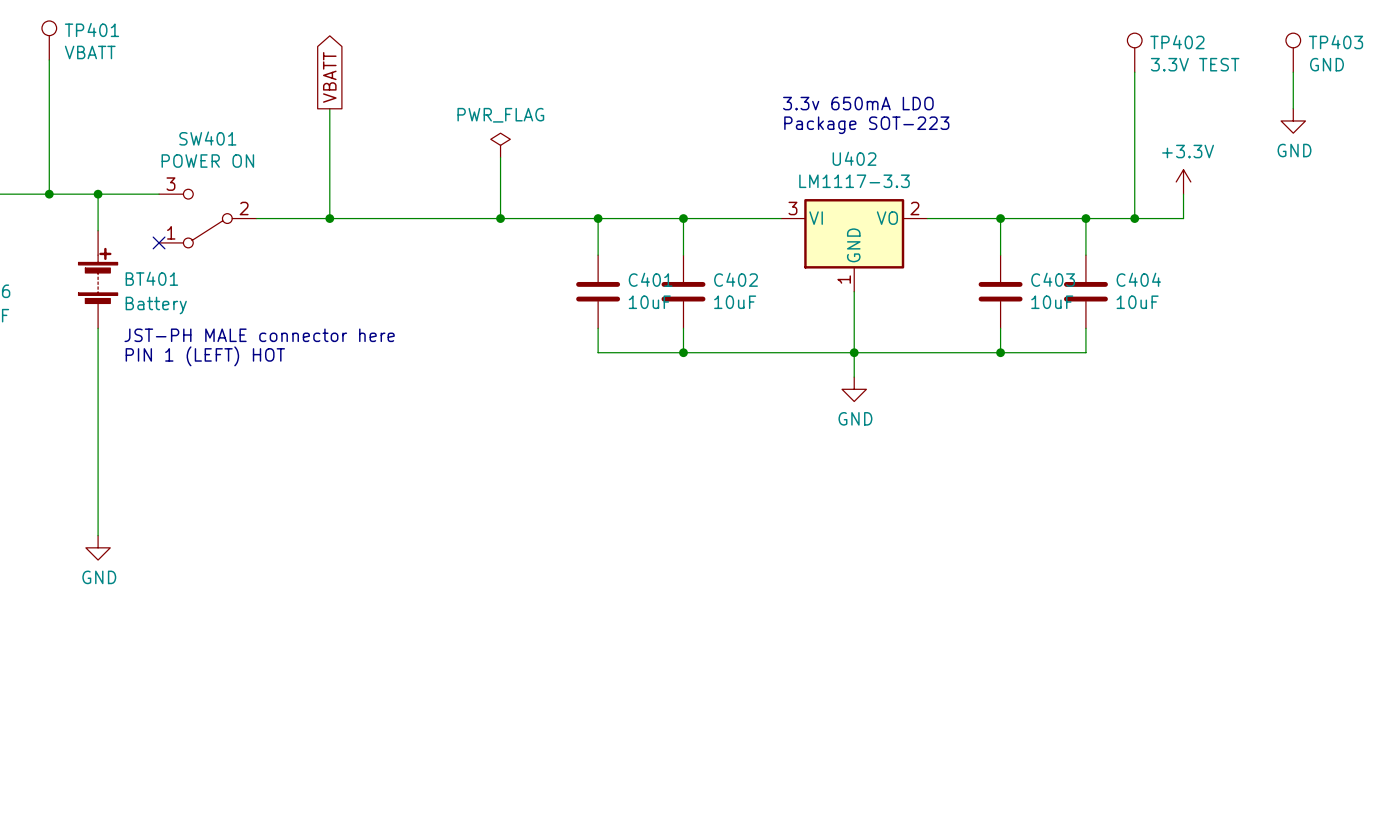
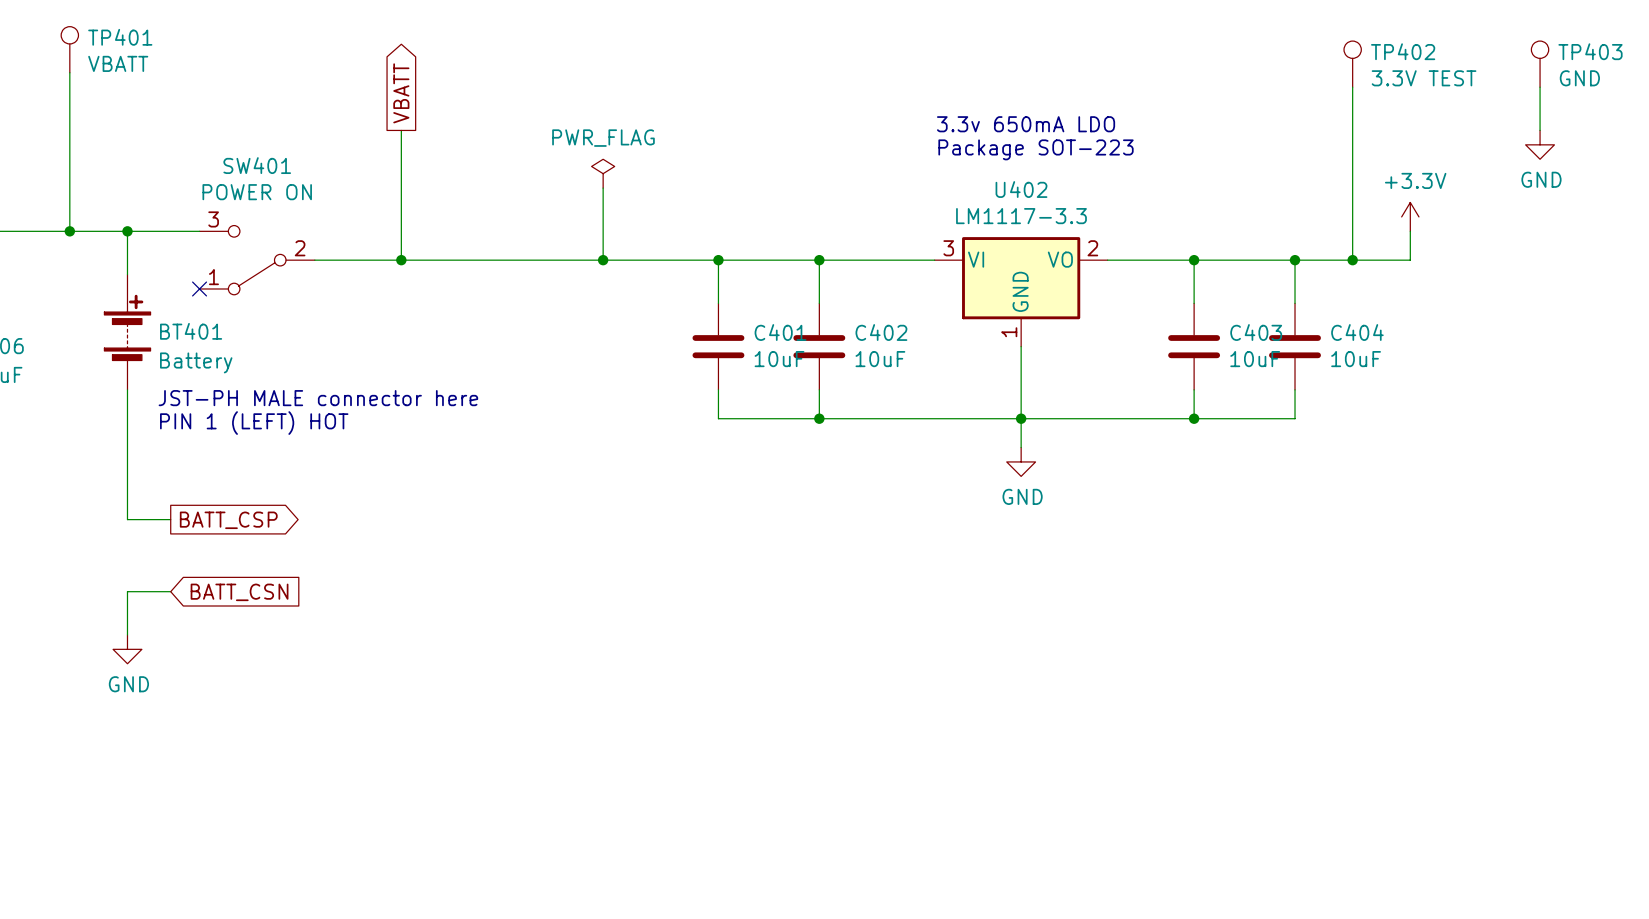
wire: (98, 438) (98, 499) -> (127, 519) (170, 519)
global label: none -> BATT_CSP (228, 520)
wire: none -> (127, 591) (170, 591)
global label: none -> BATT_CSN (239, 592)

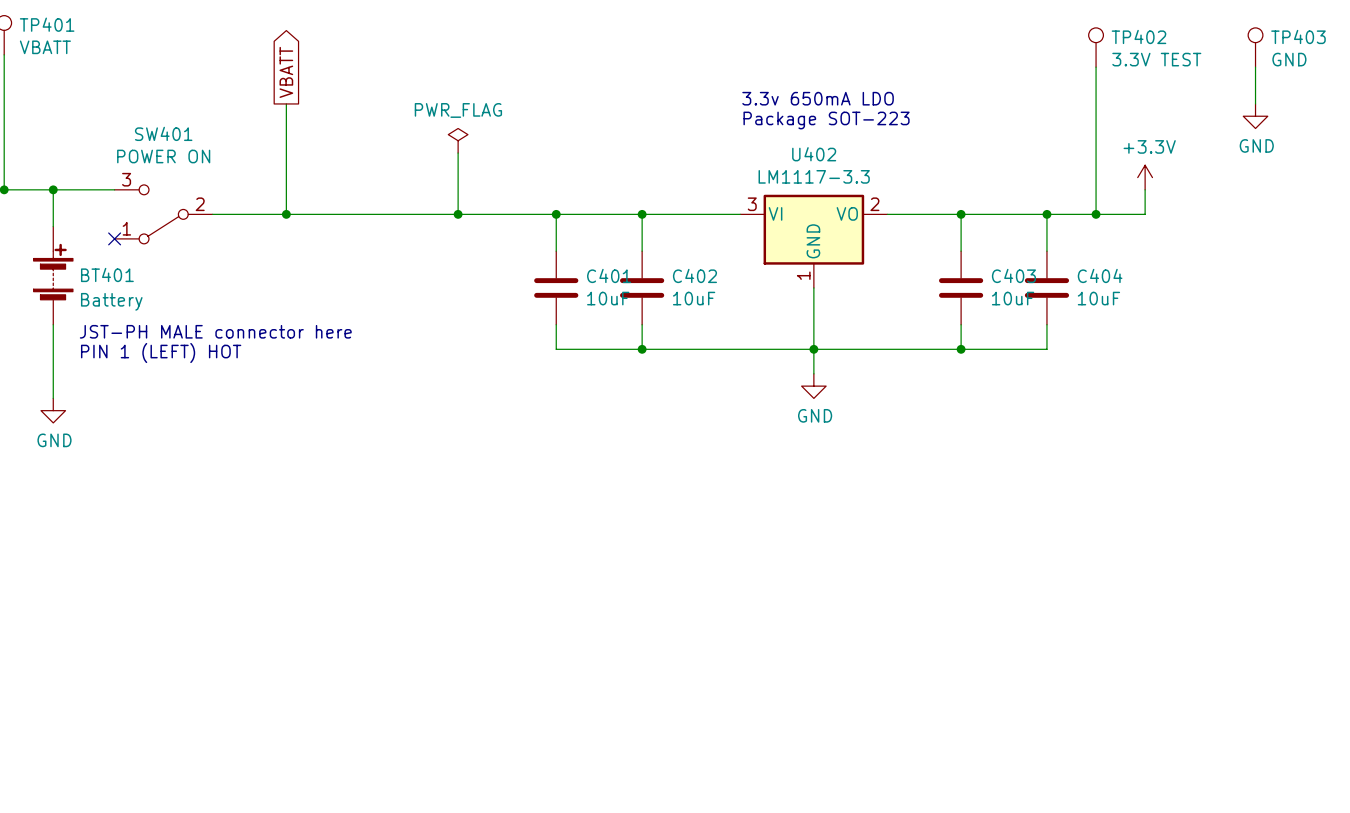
wire: (127, 476) (127, 519) (170, 519) -> none
global label: BATT_CSP (228, 520) -> none
wire: (170, 591) (127, 591) (127, 634) -> none
global label: BATT_CSN (239, 592) -> none
power symbol position: GND (127, 649) -> GND (53, 410)

